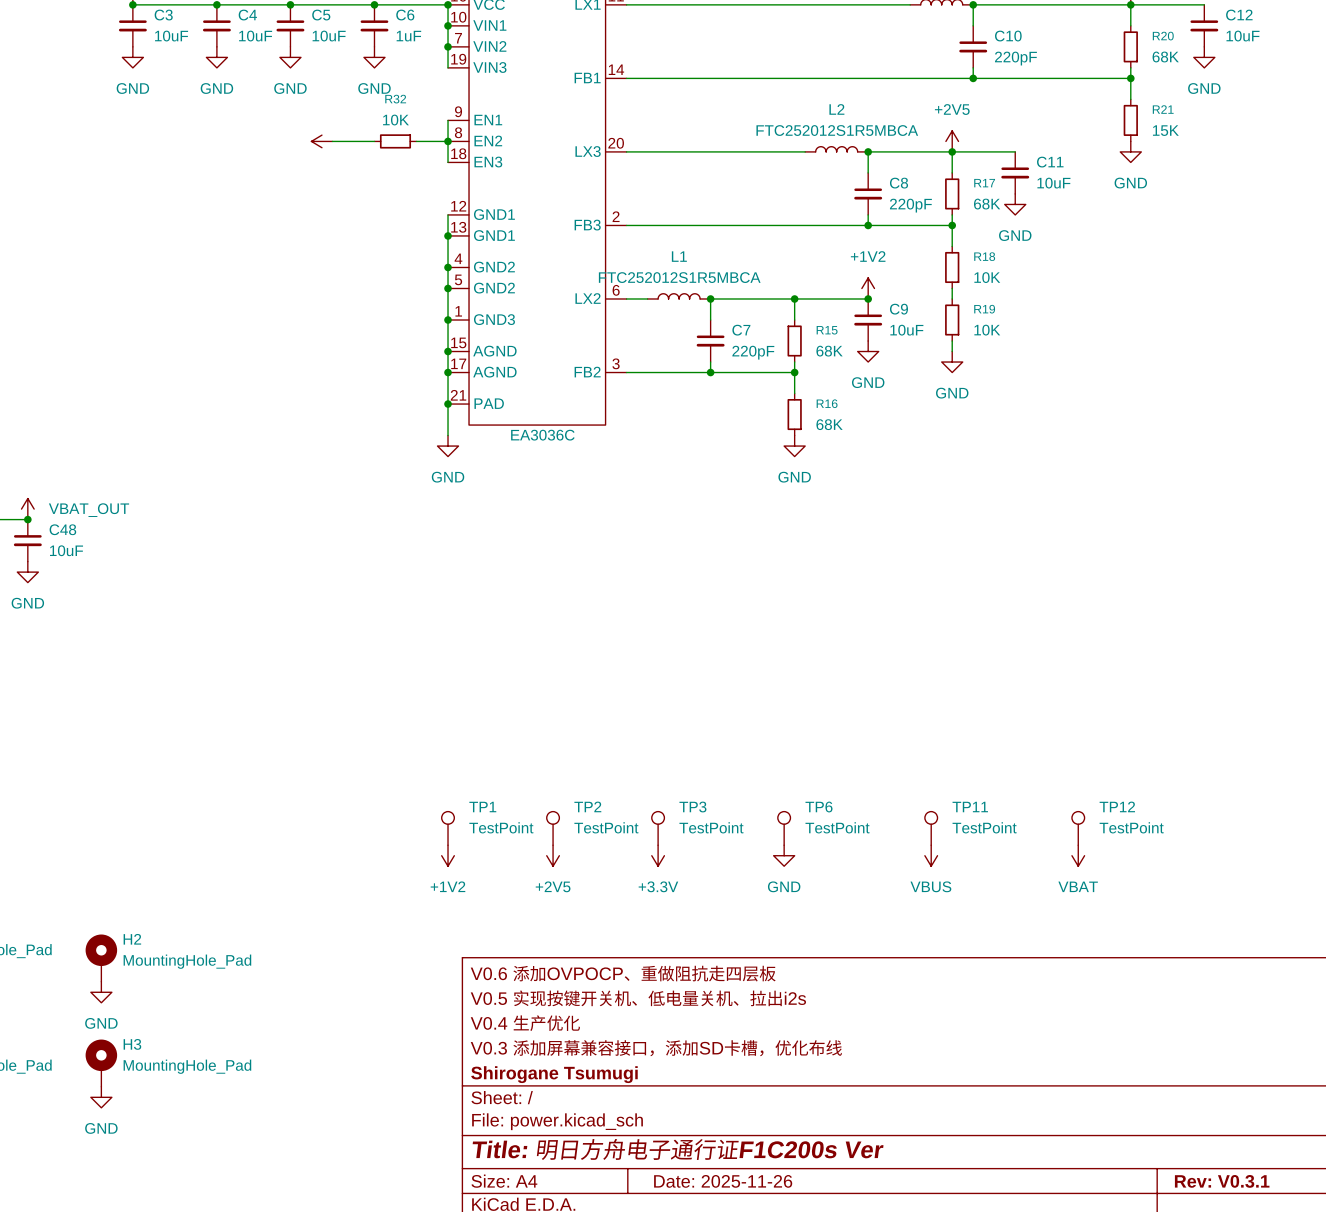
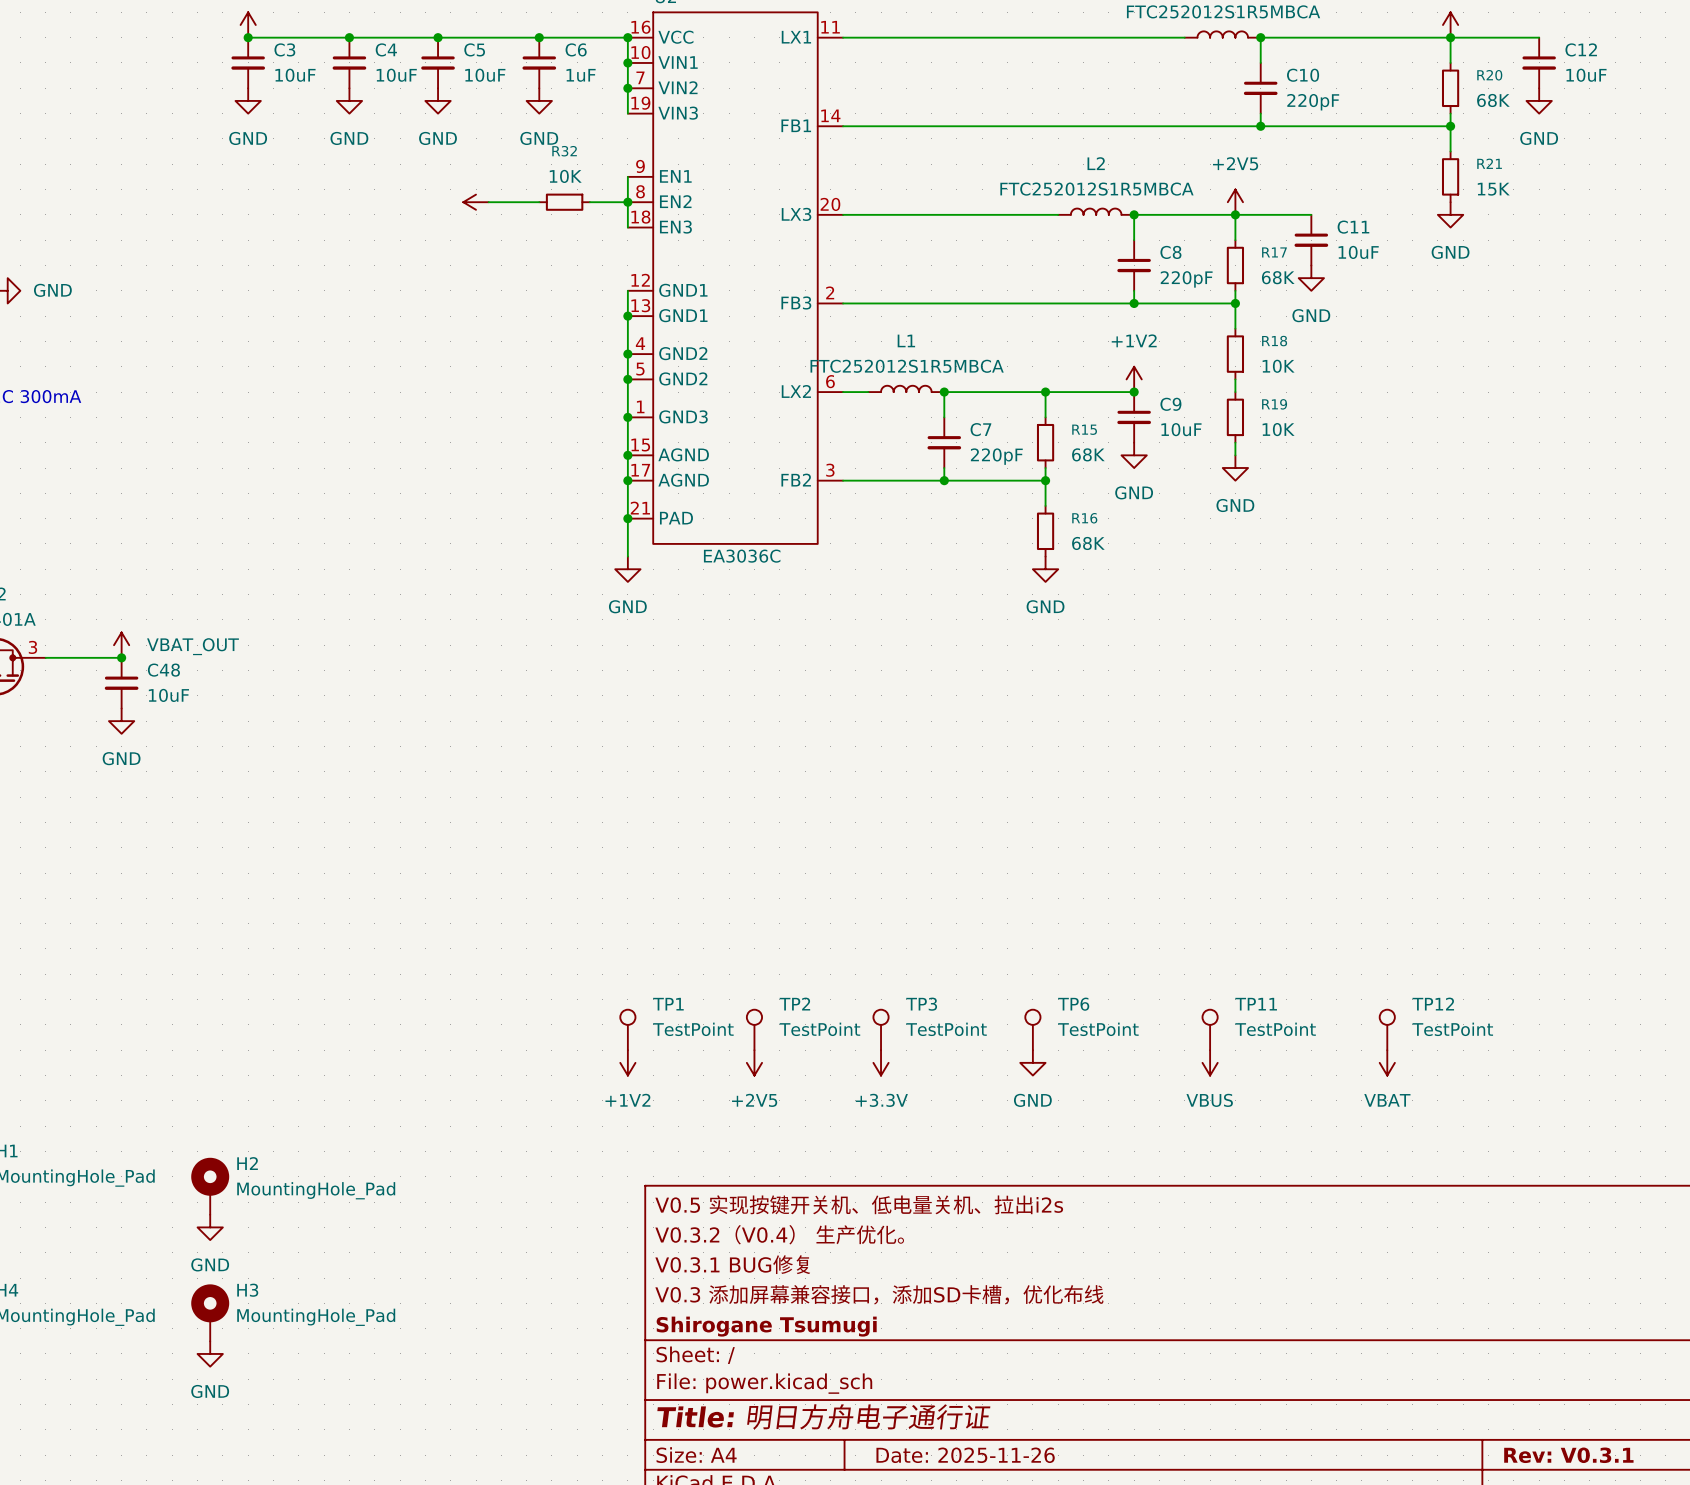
title block: V0.6 添加OVPOCP、重做阻抗走四层板 (623, 973) -> V0.5 实现按键开关机、低电量关机、拉出i2s (859, 1204)
title block: V0.5 实现按键开关机、低电量关机、拉出i2s (638, 998) -> V0.3.2（V0.4） 生产优化。 (779, 1234)
title block: V0.4 生产优化 (525, 1023) -> V0.3.1 BUG修复 (732, 1264)
title block: Title: 明日方舟电子通行证F1C200s Ver (678, 1149) -> Title: 明日方舟电子通行证 (823, 1416)

